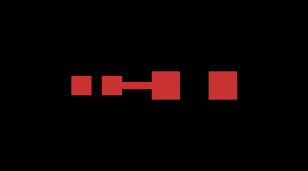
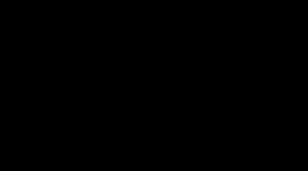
part: (96, 85) -> none
top track: (165, 85) (111, 85) -> none
part: (194, 85) -> none

